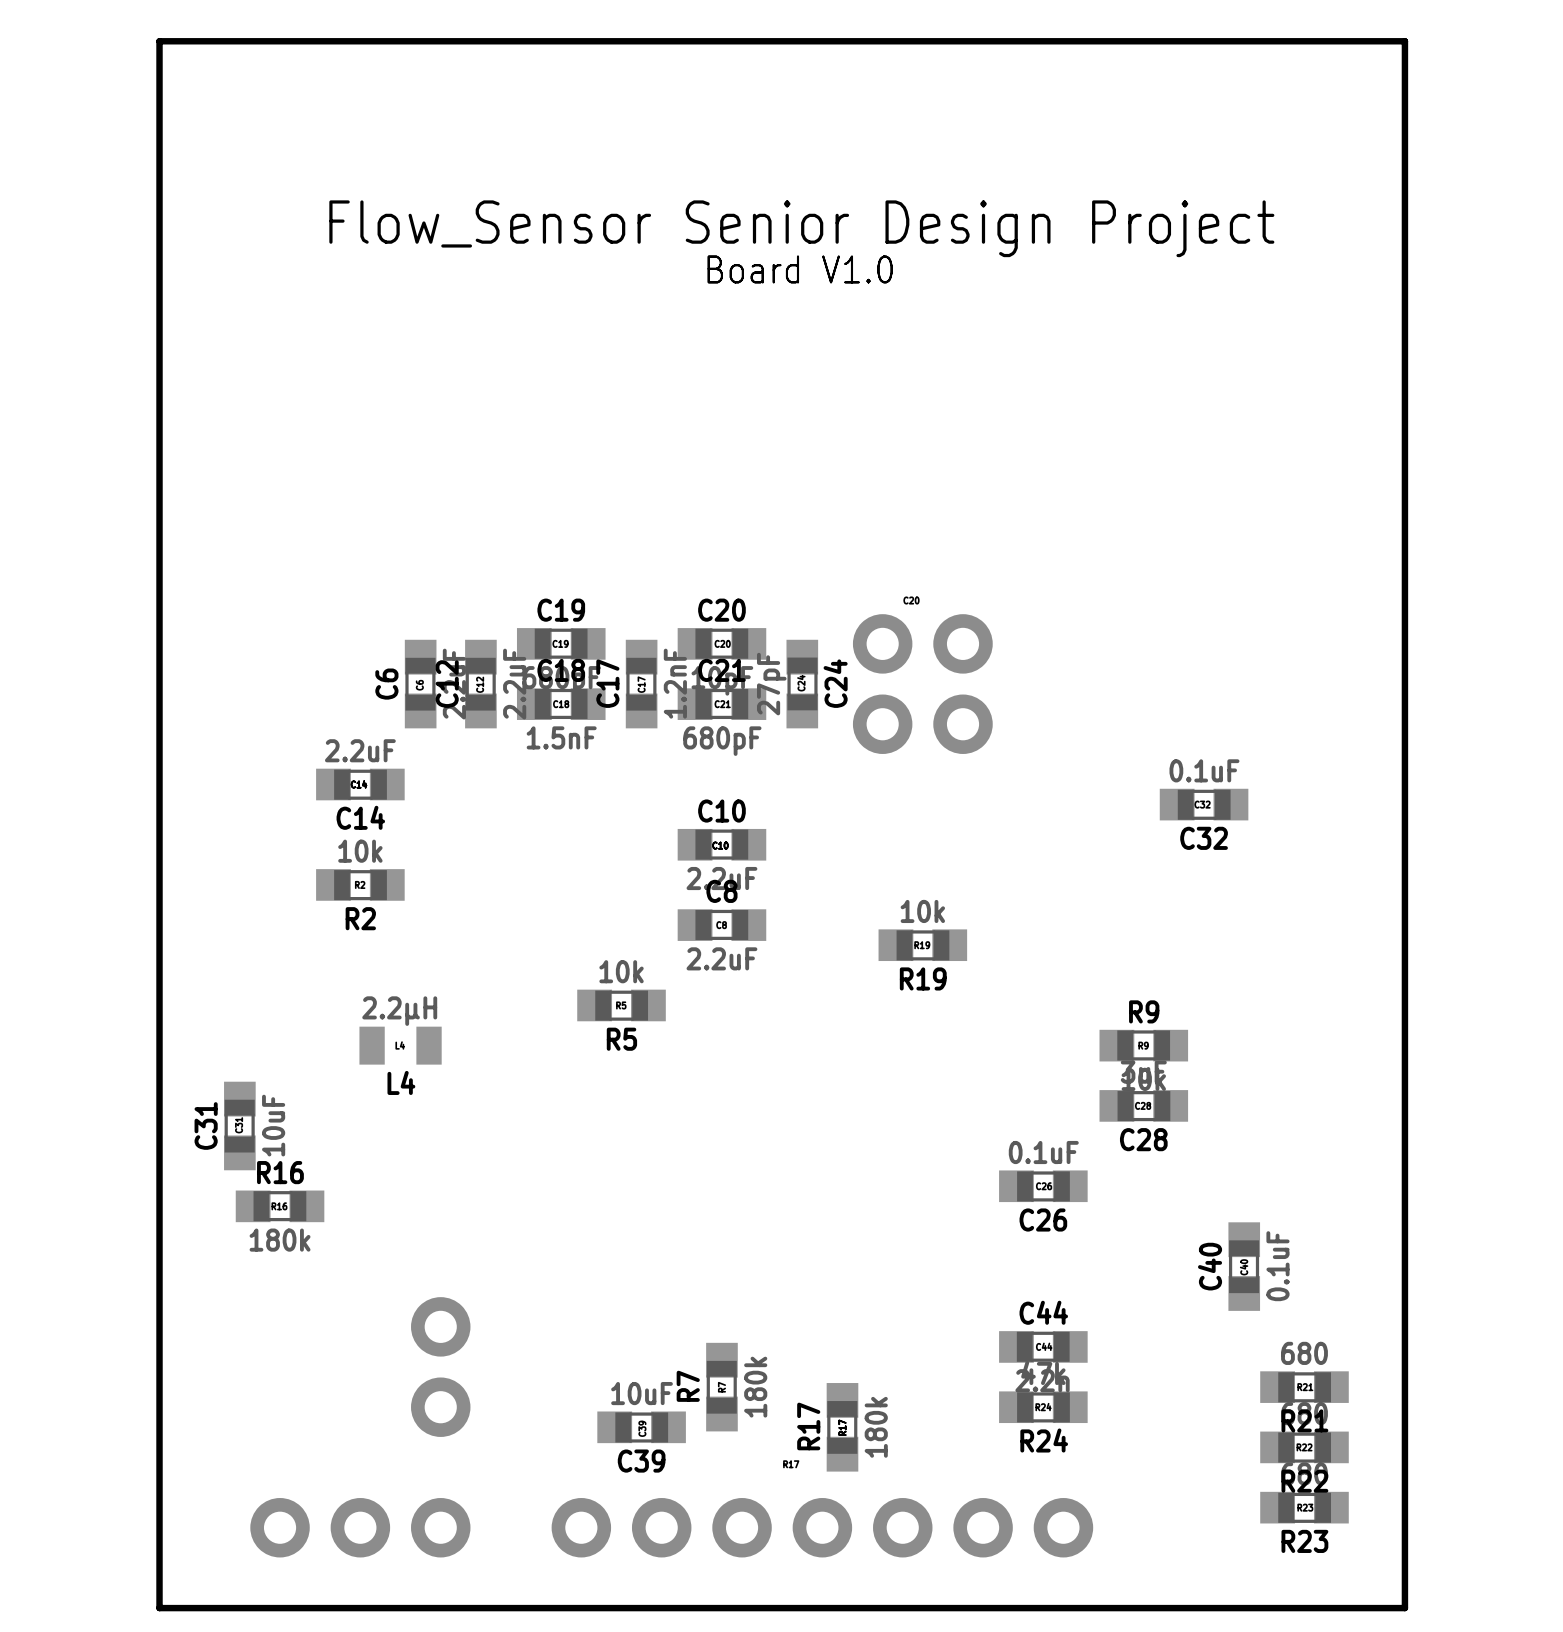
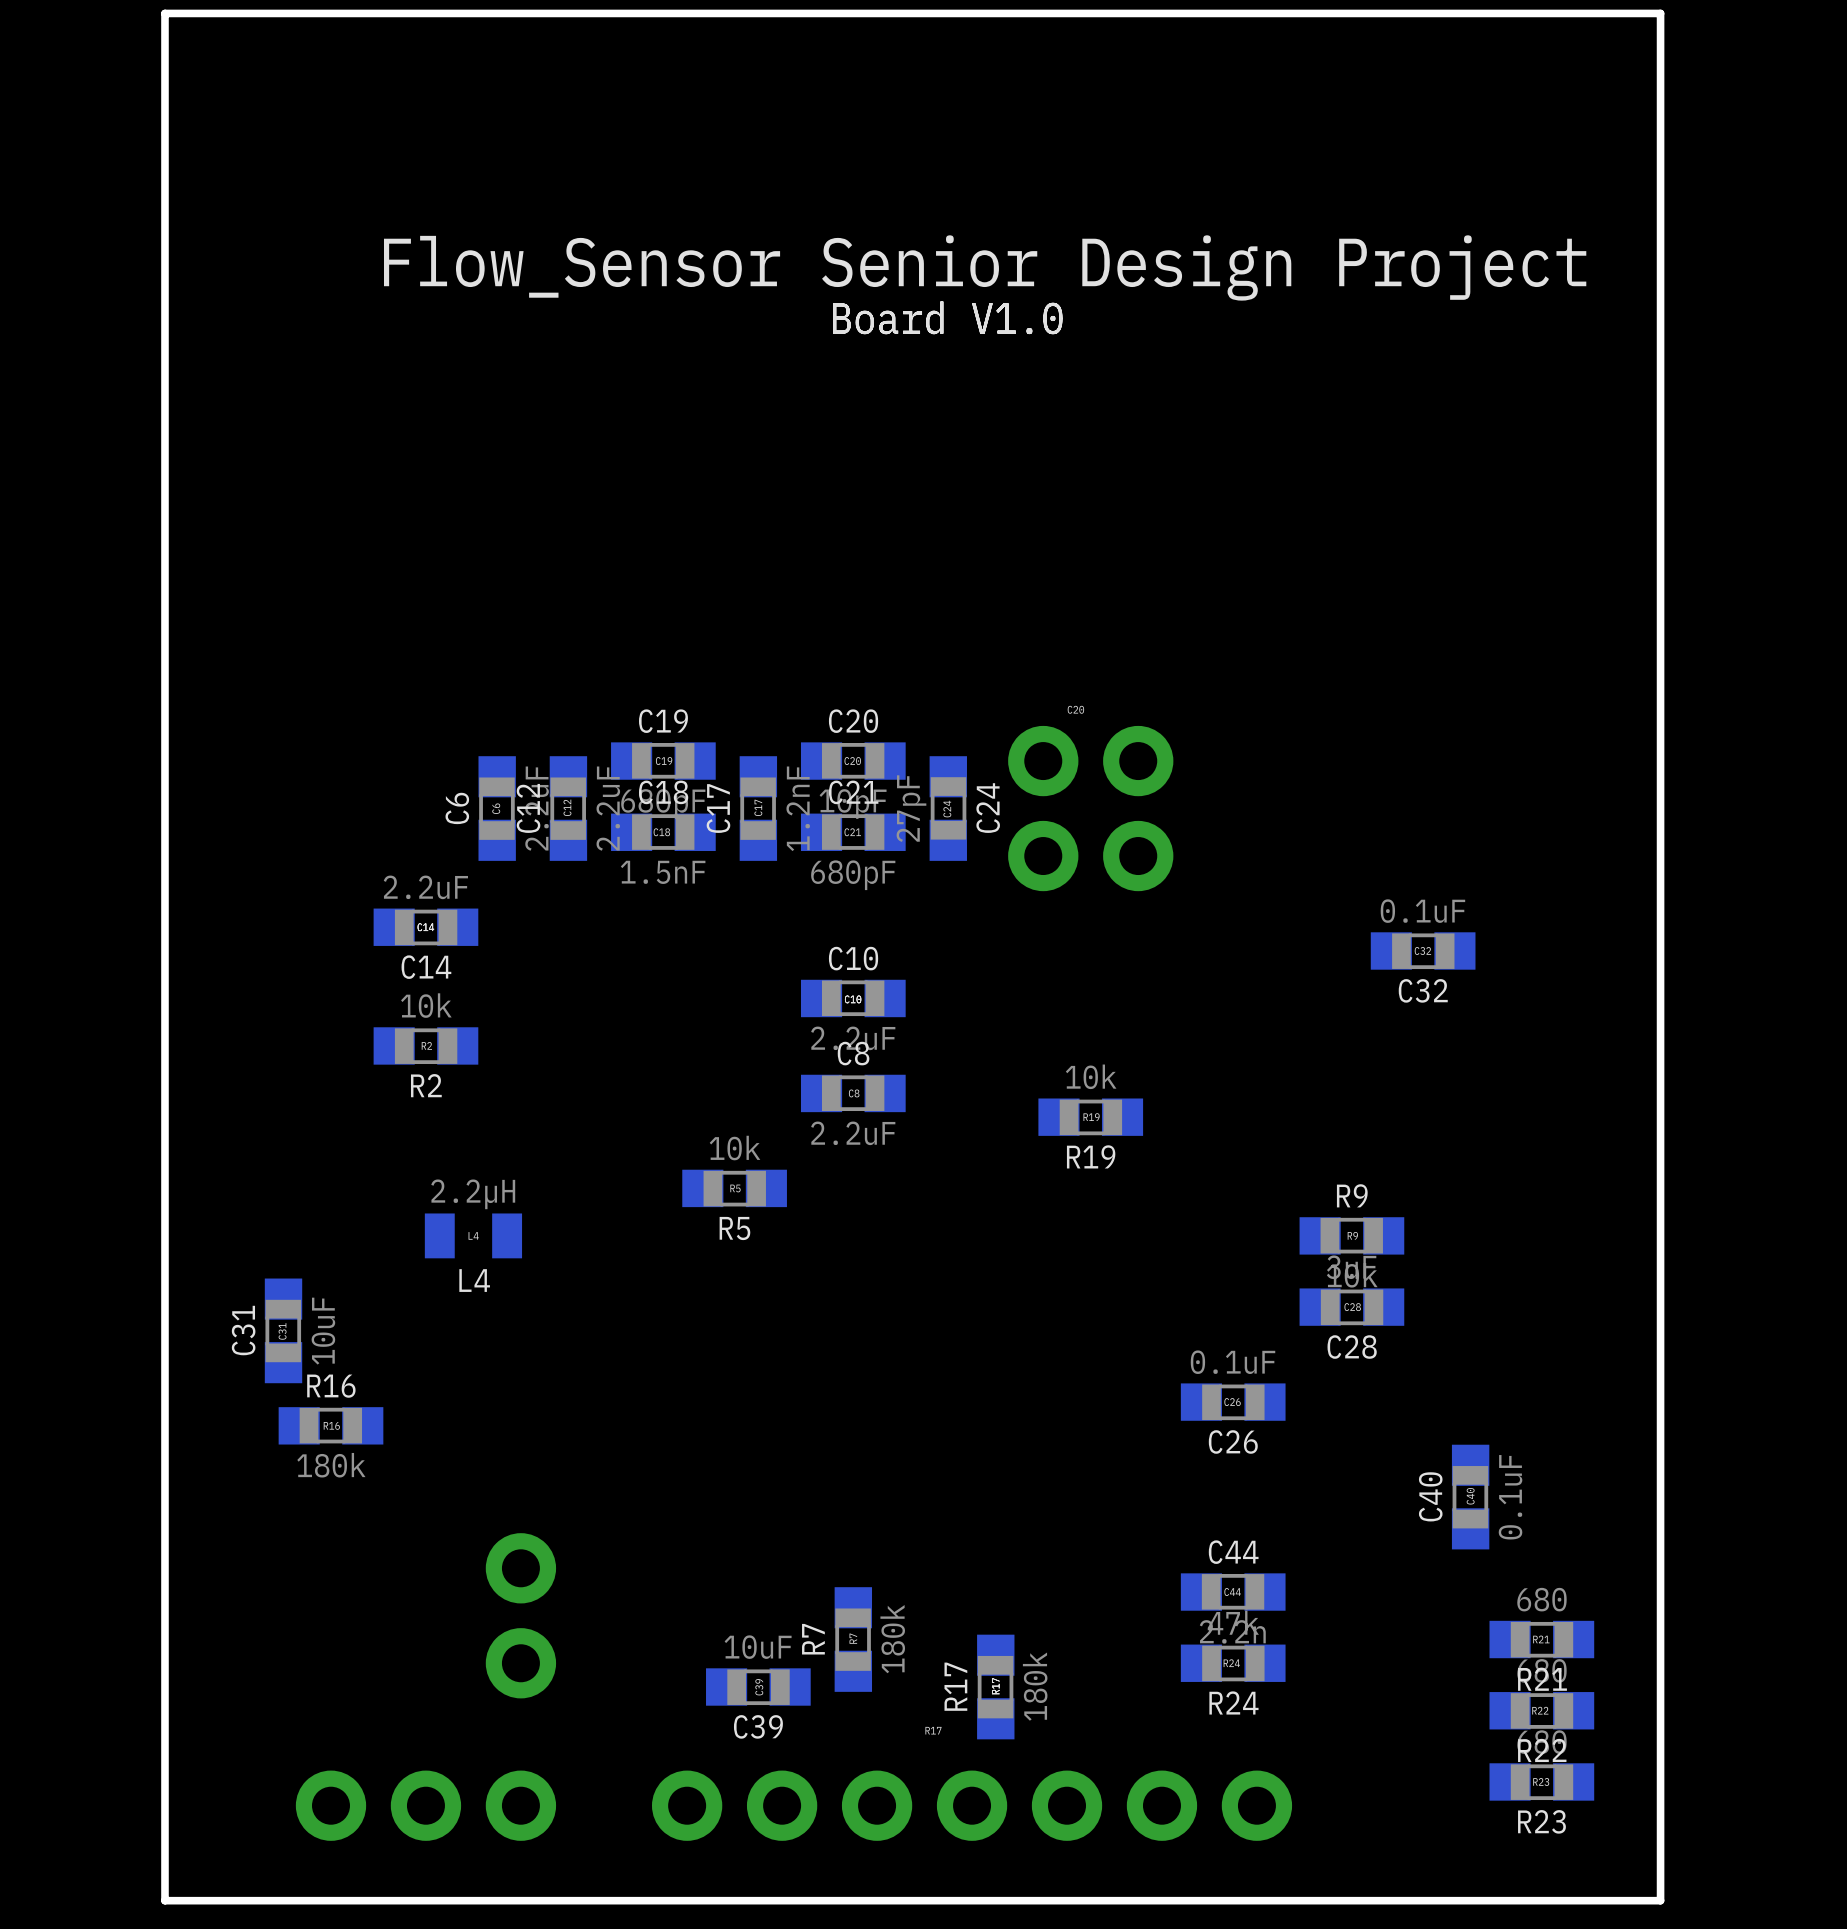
board edge: (1404, 41) (159, 41) (159, 1608) -> (1660, 48) (1660, 13) (164, 13) (164, 1900) (188, 1900)

